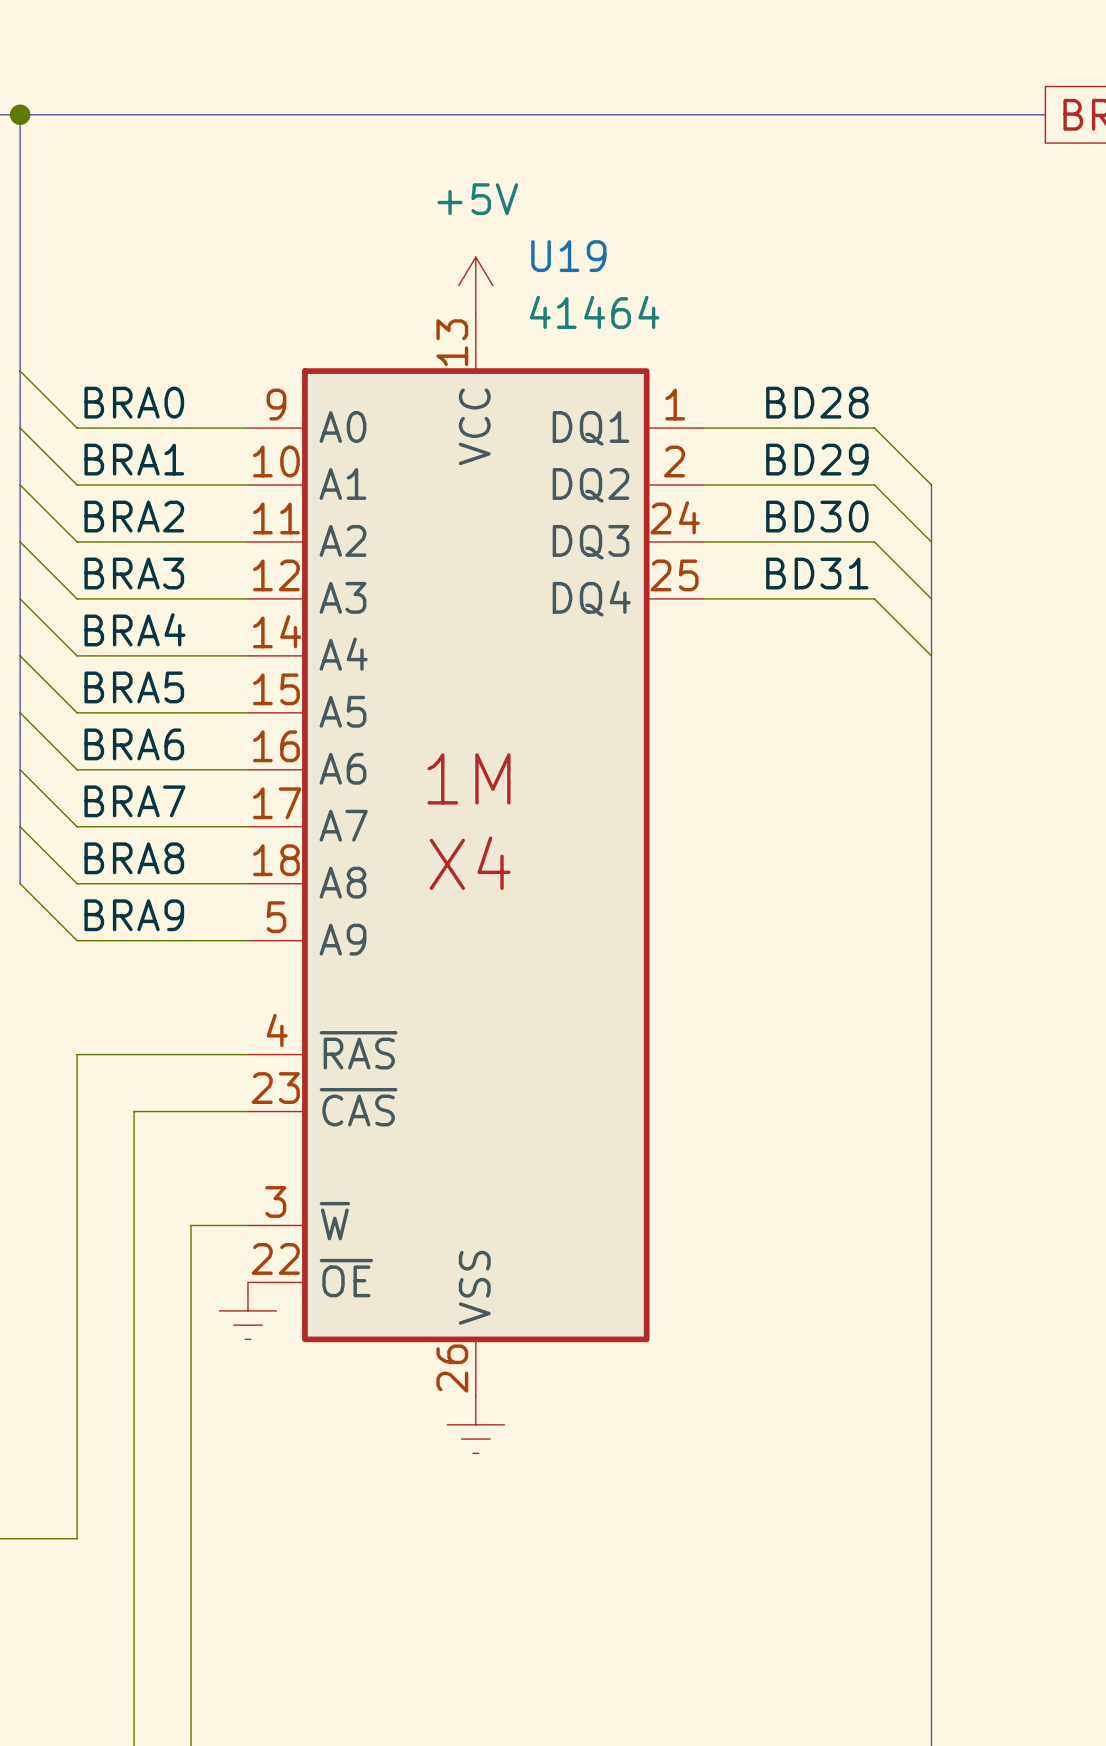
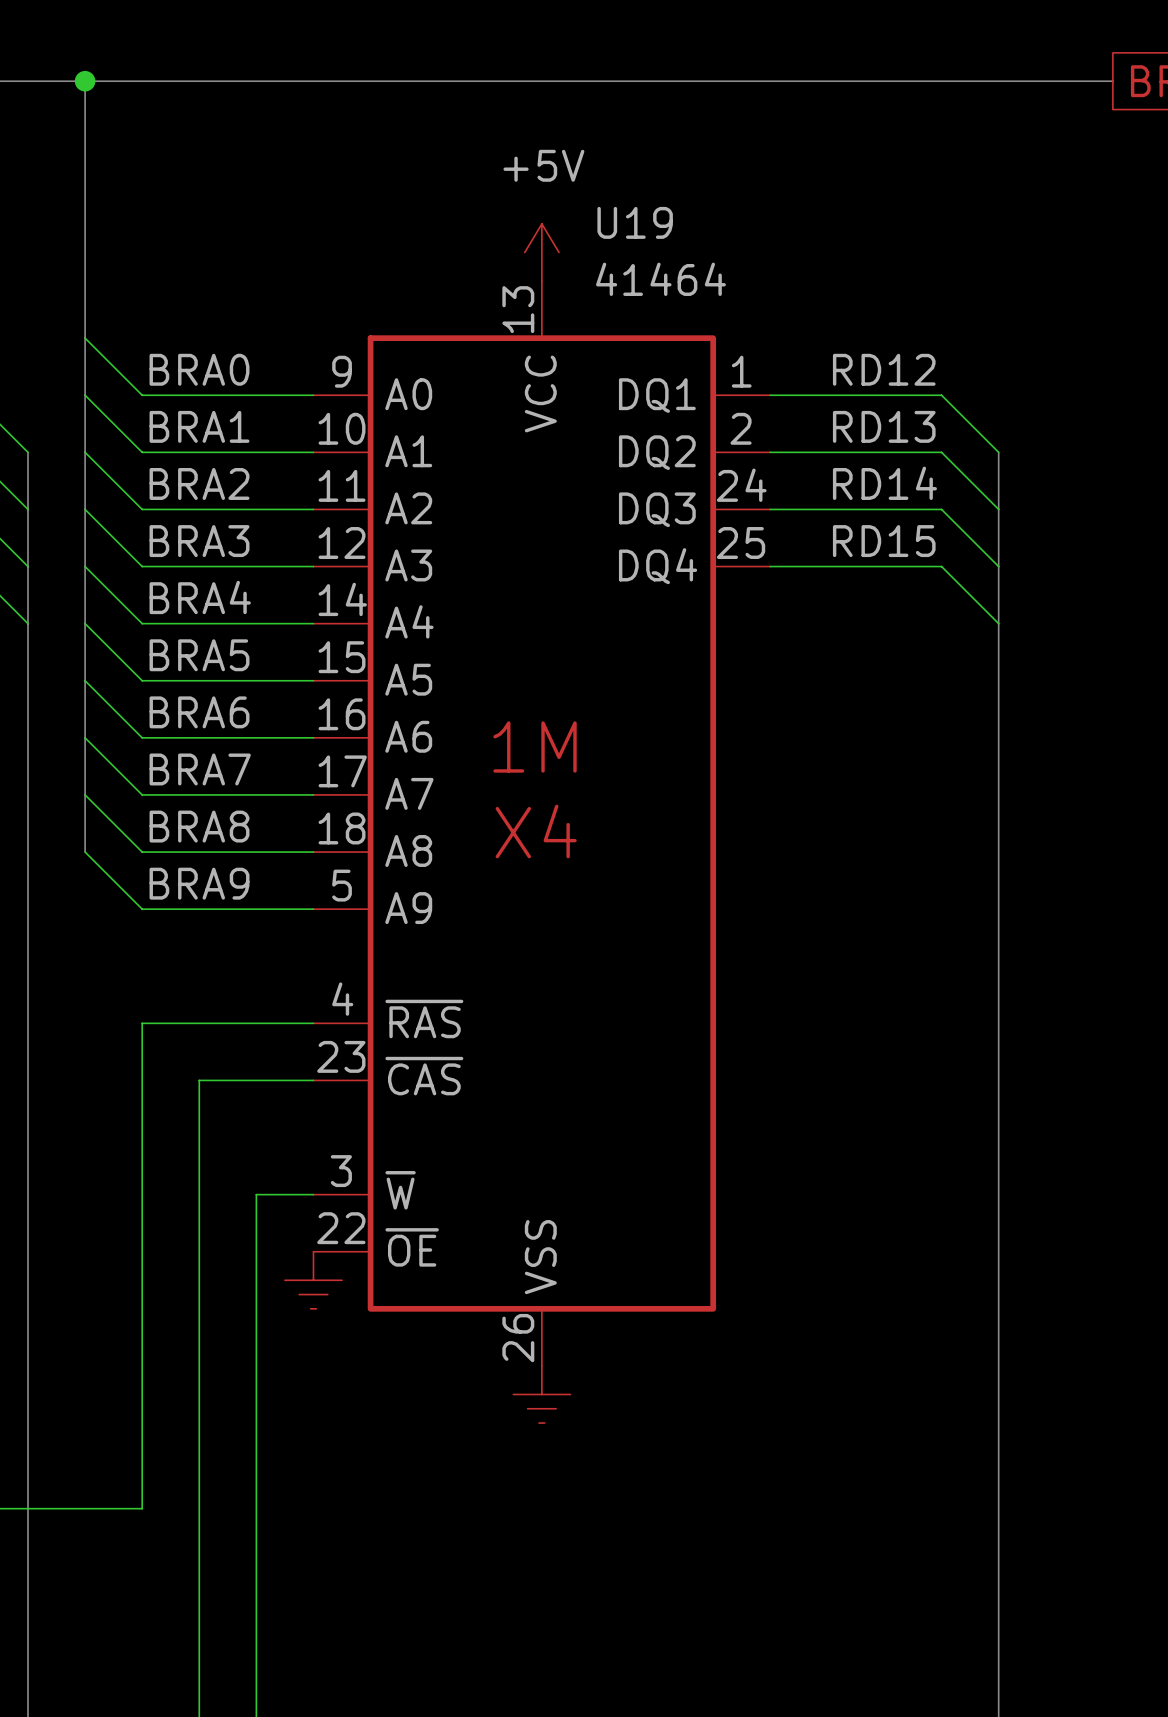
label: BD28 (817, 402) -> RD12 (884, 369)
label: BD29 (817, 459) -> RD13 (884, 426)
label: BD30 (817, 516) -> RD14 (884, 483)
label: BD31 (817, 573) -> RD15 (884, 541)

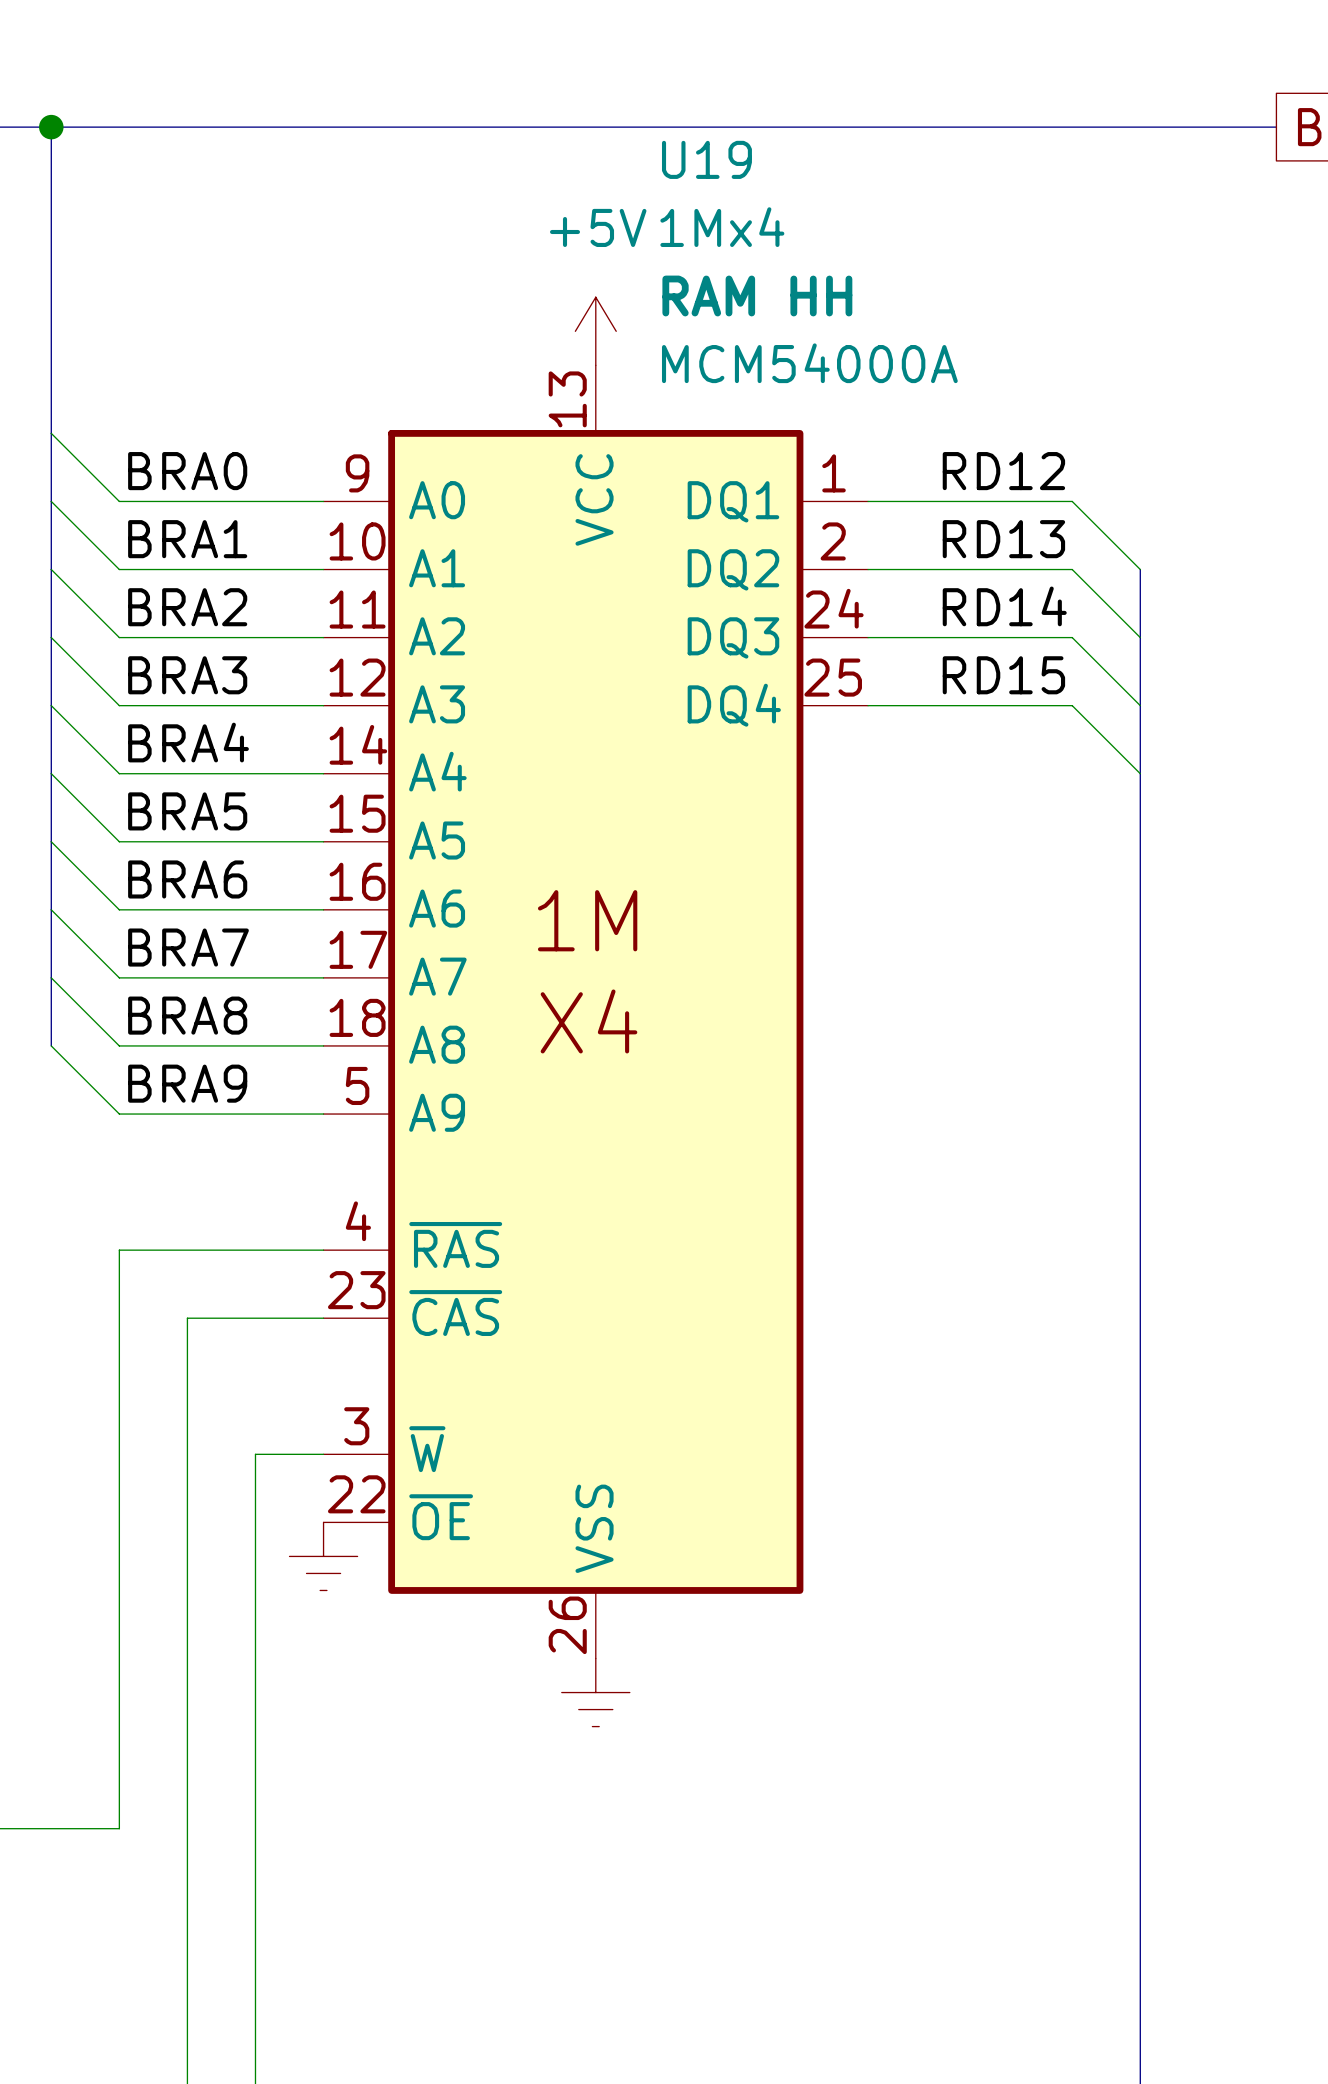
U19 name position: U19 (635, 222) -> U19 (706, 159)
U19 text: none -> RAM HH (757, 296)
U19 value: 41464 (660, 279) -> 1Mx4 (722, 227)
U19 text: none -> MCM54000A (809, 363)

